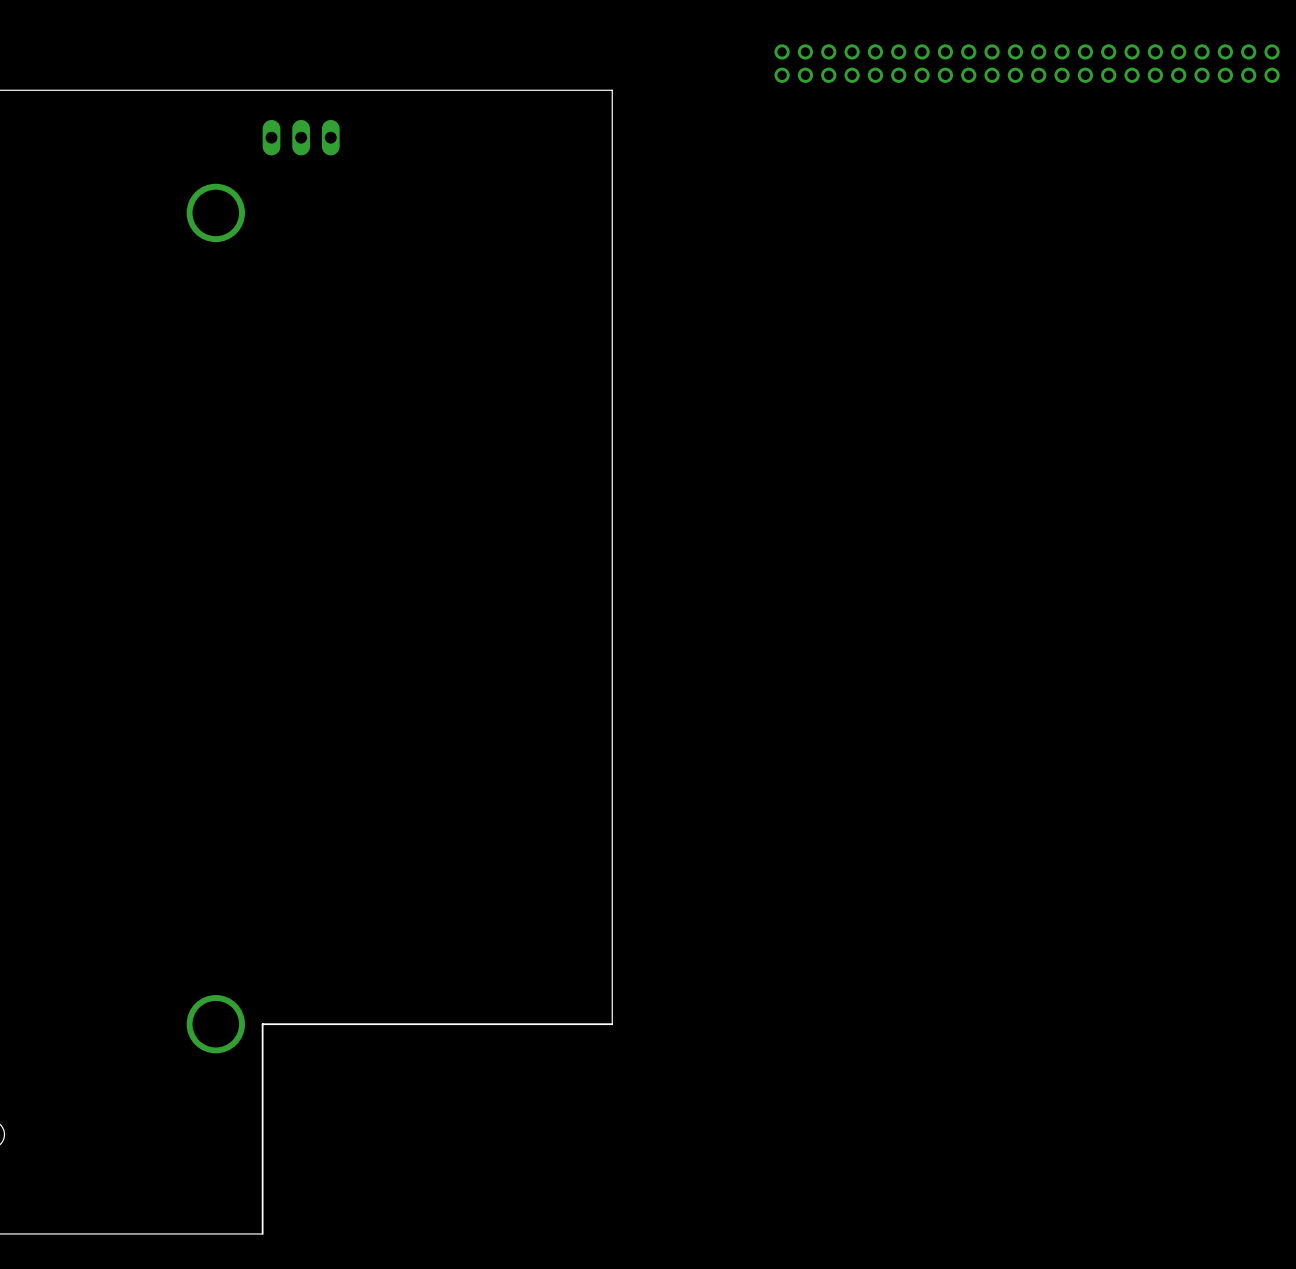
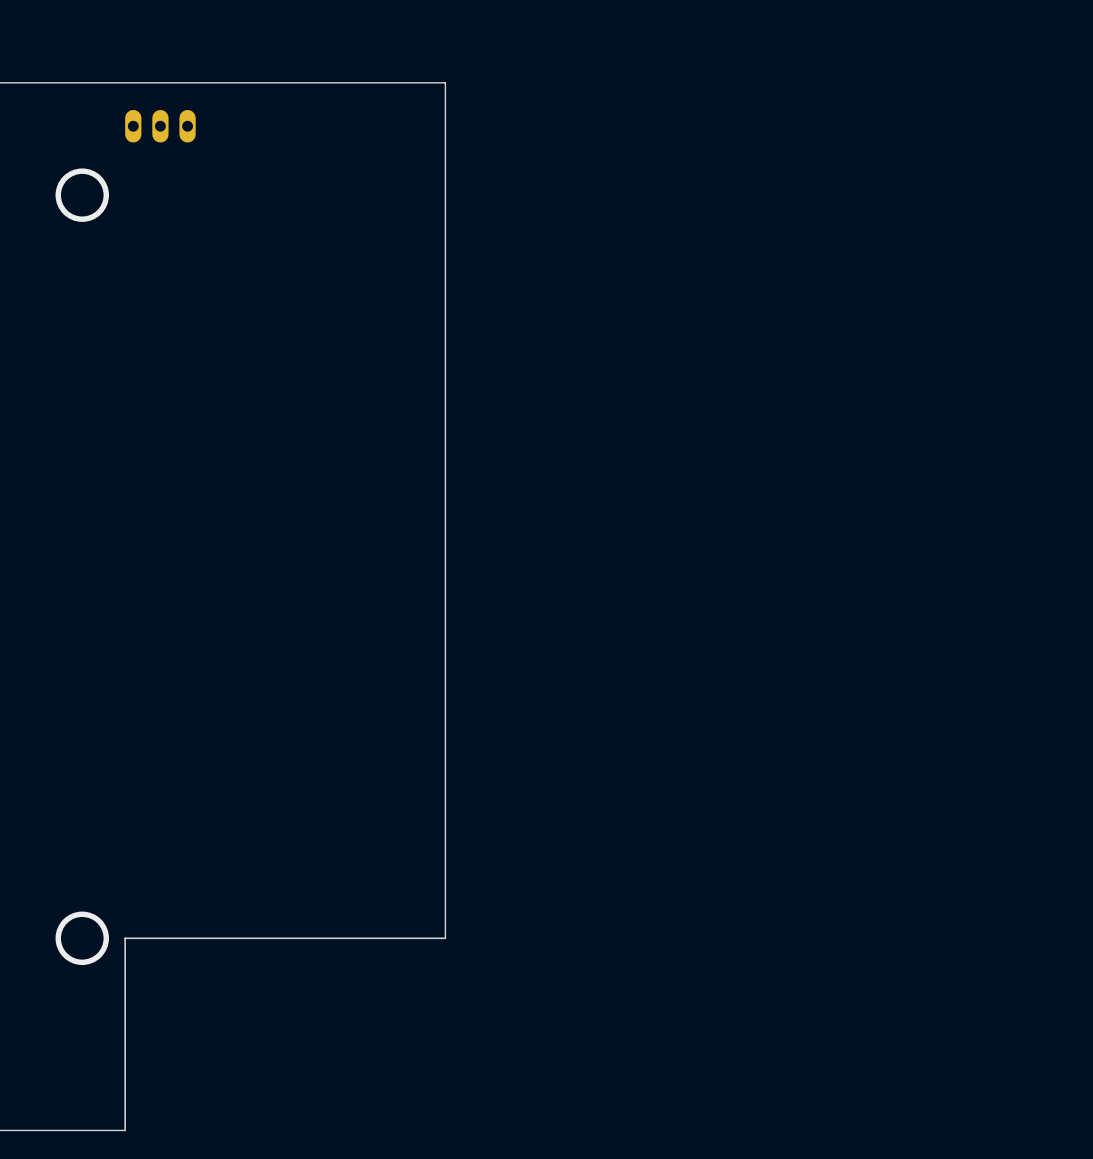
part: (1027, 63) -> none

